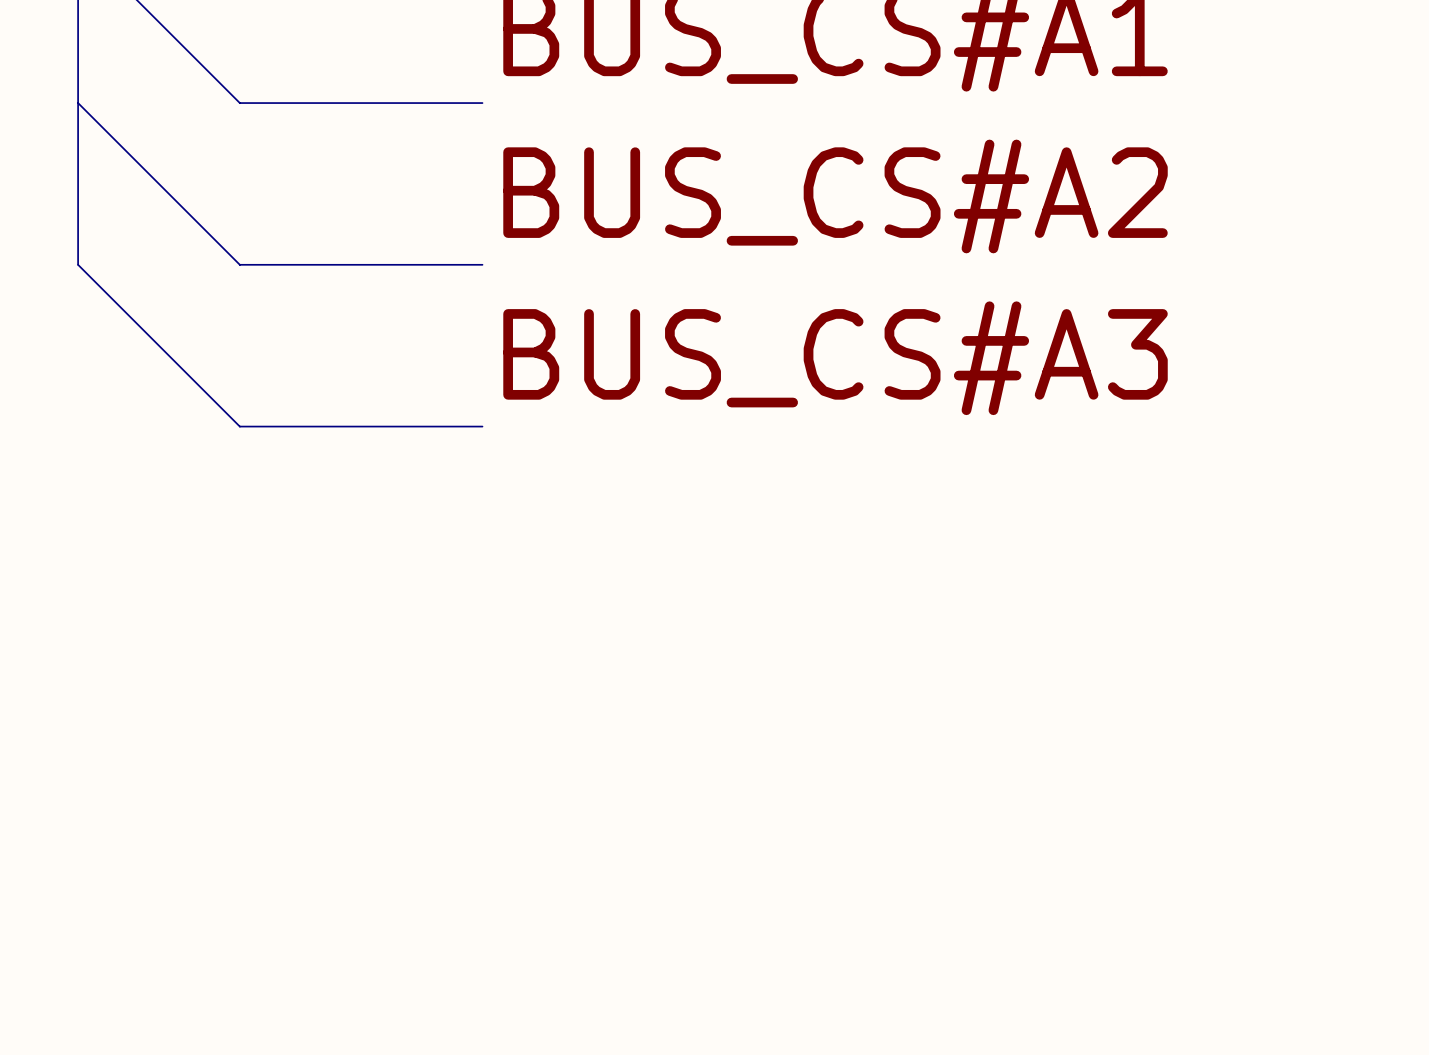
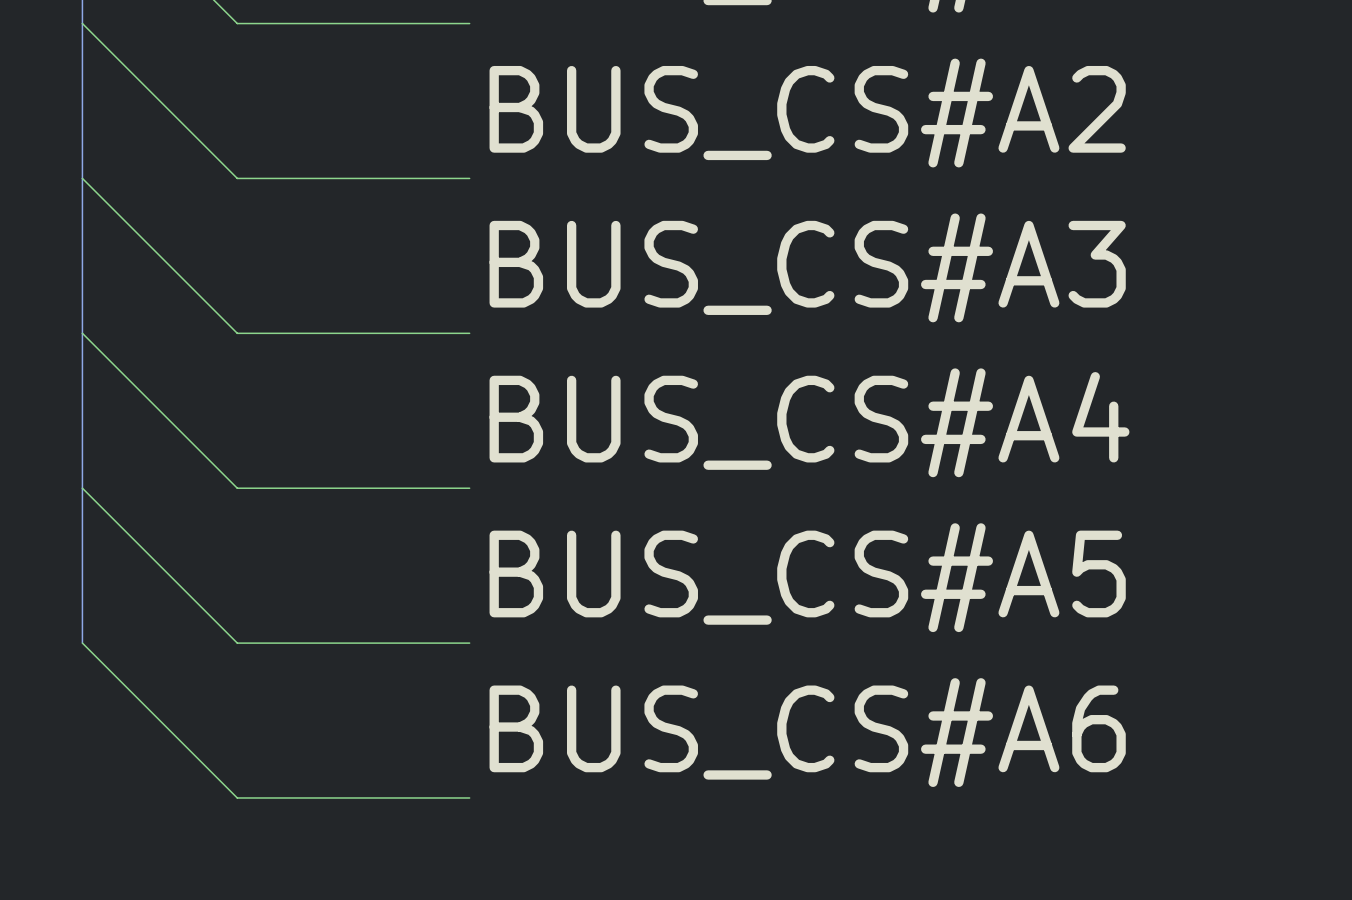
bus: none -> (82, 178) (82, 643)
wire: none -> (82, 333) (237, 488) (469, 488)
label: none -> BUS_CS#A4 (809, 422)
wire: none -> (82, 488) (237, 643) (469, 643)
label: none -> BUS_CS#A5 (807, 577)
wire: none -> (82, 643) (237, 797) (469, 797)
label: none -> BUS_CS#A6 (807, 732)

